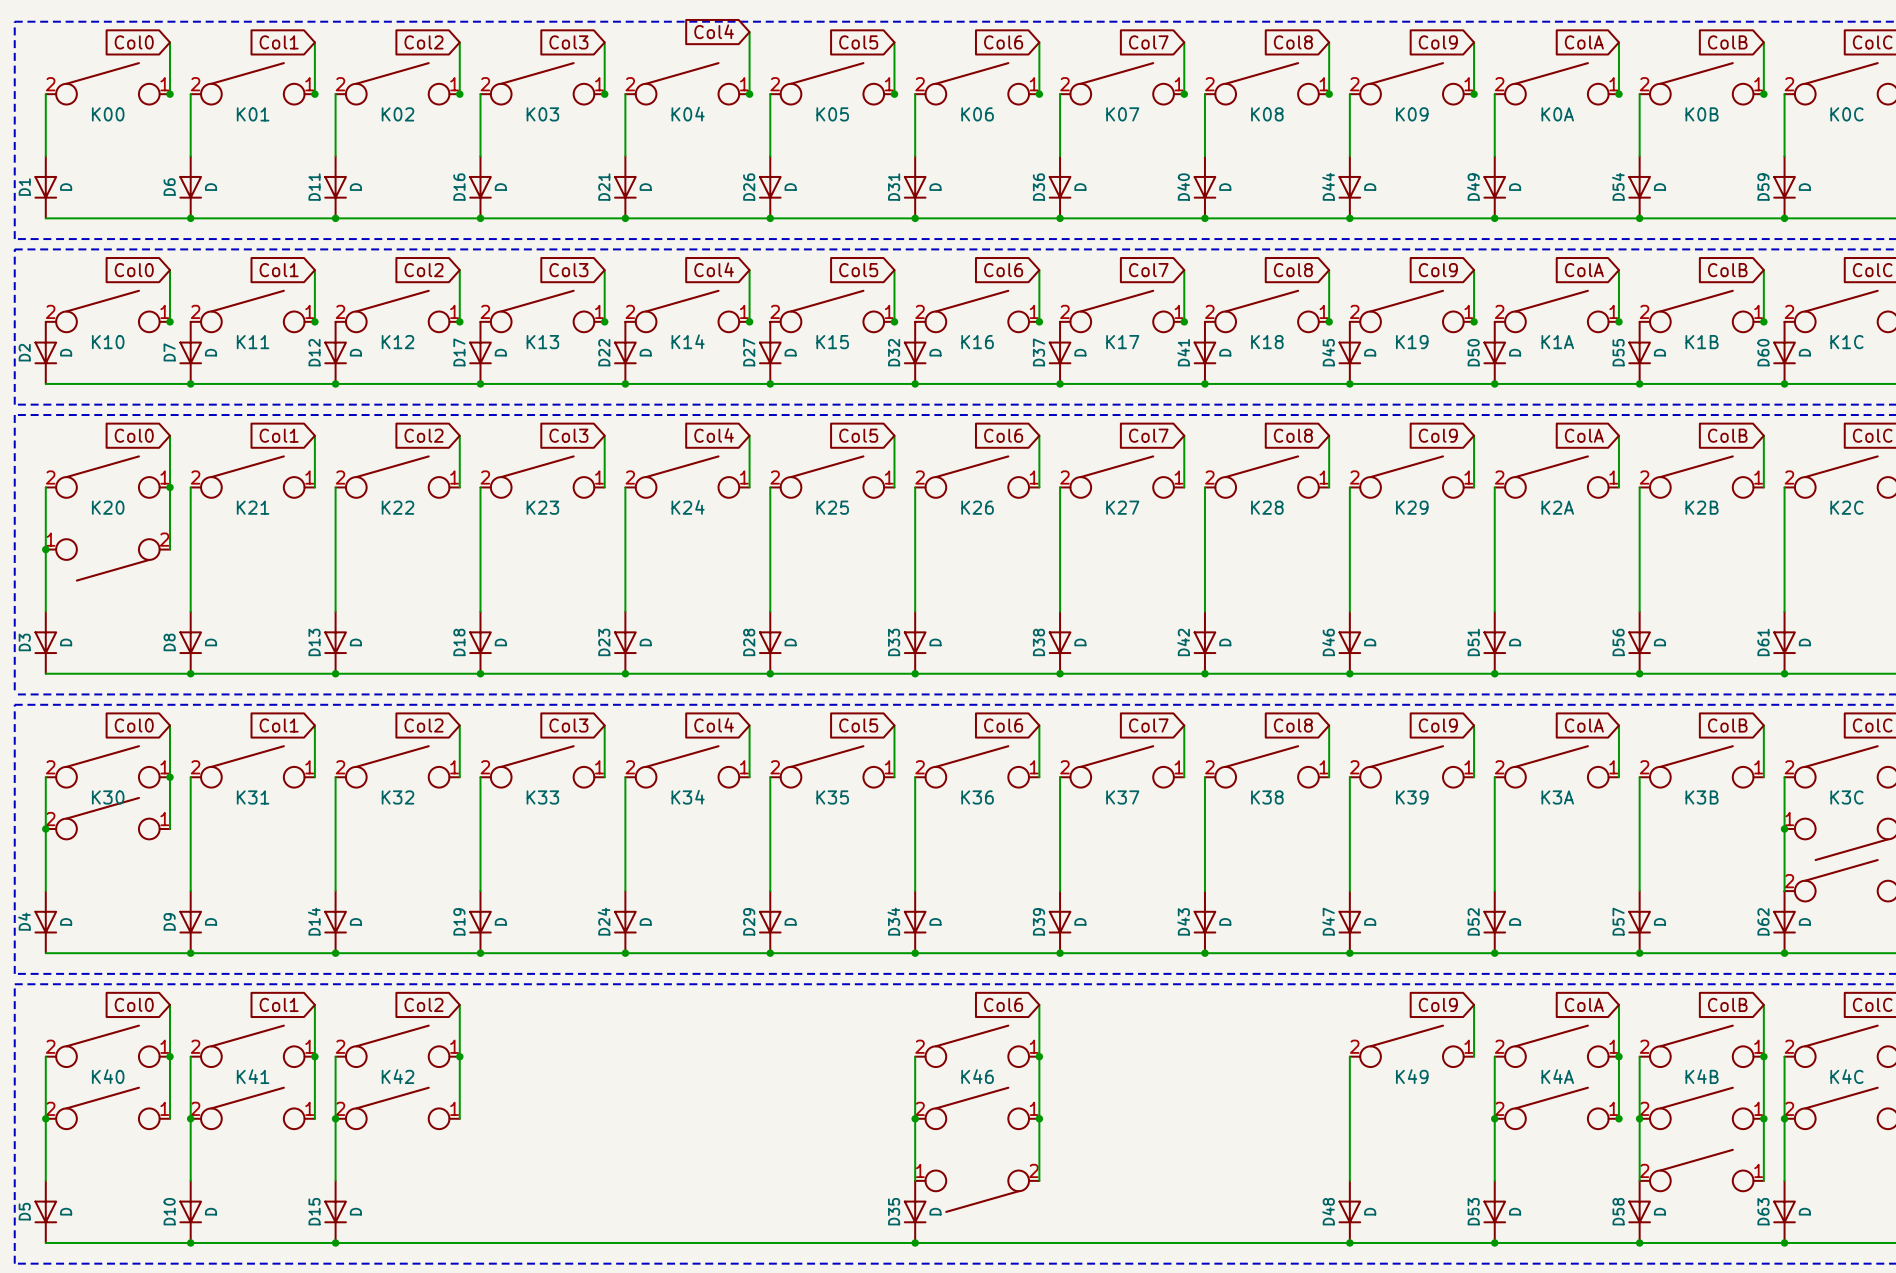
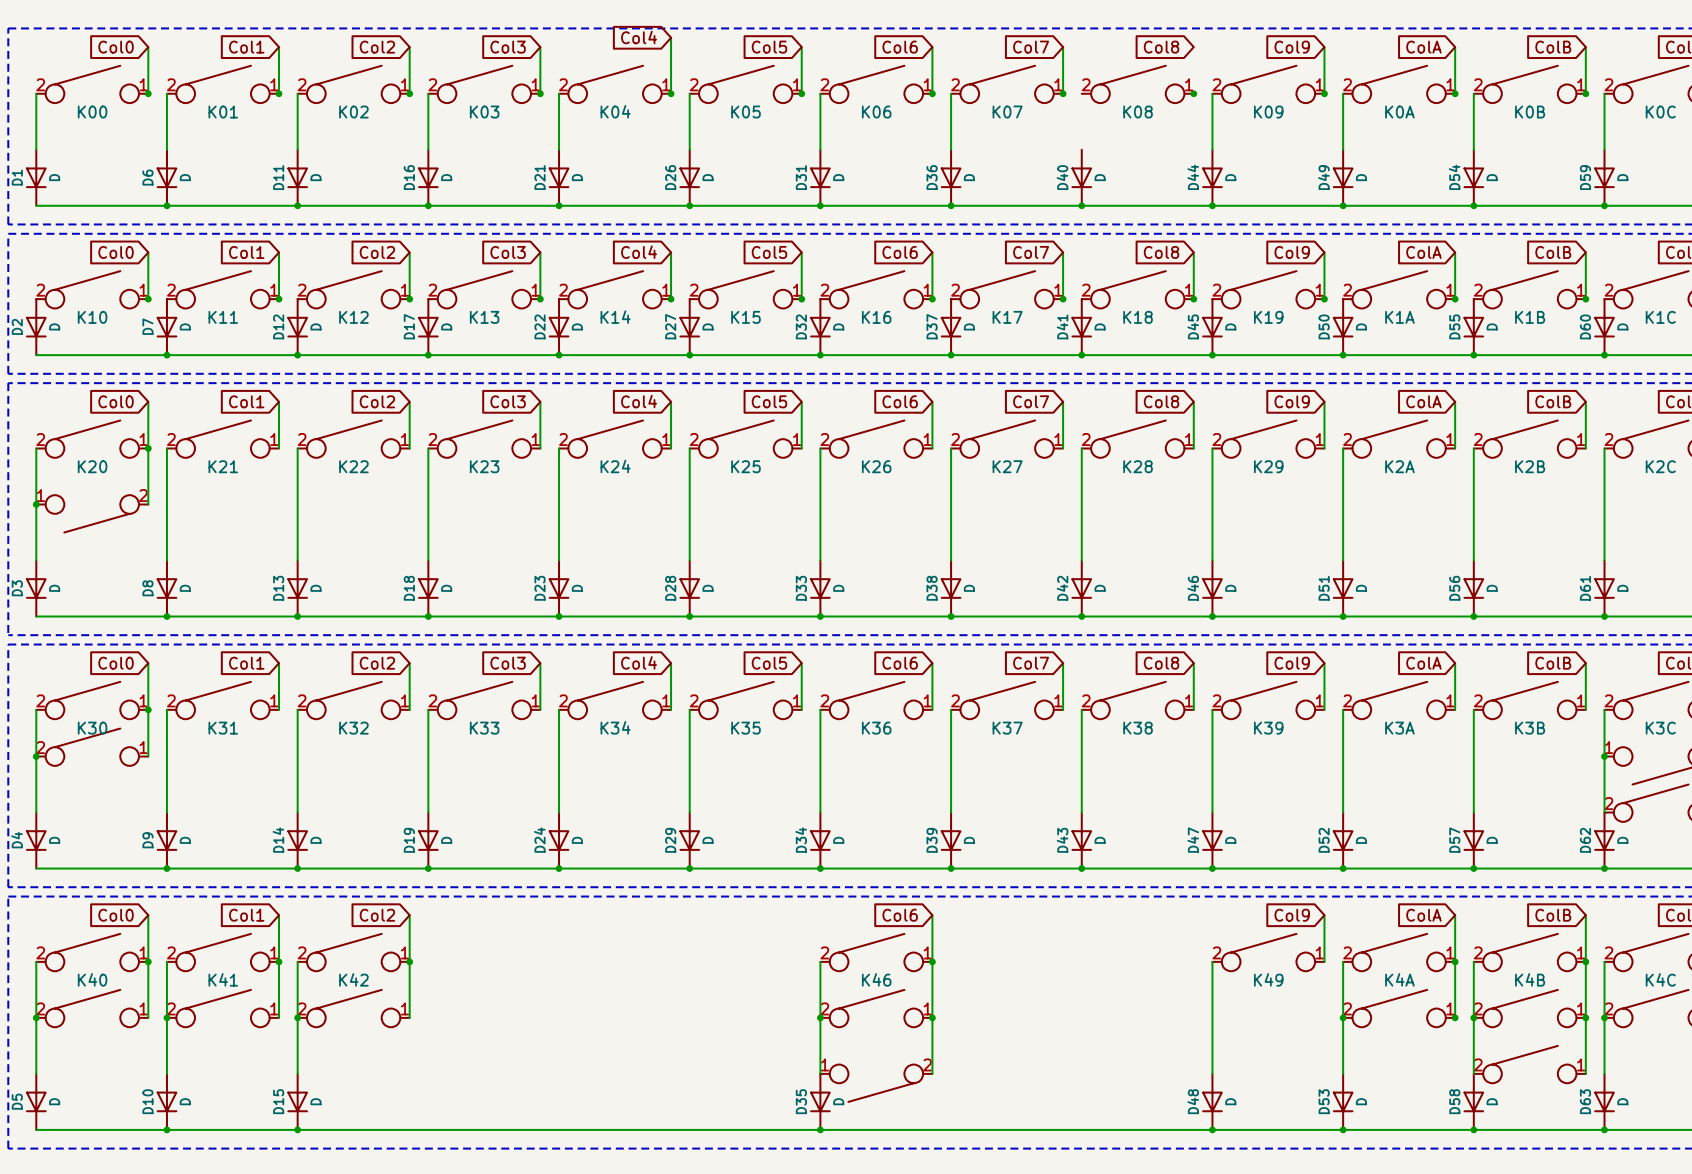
wire: (1329, 42) (1329, 94) -> none
wire: (1204, 94) (1204, 156) -> none

